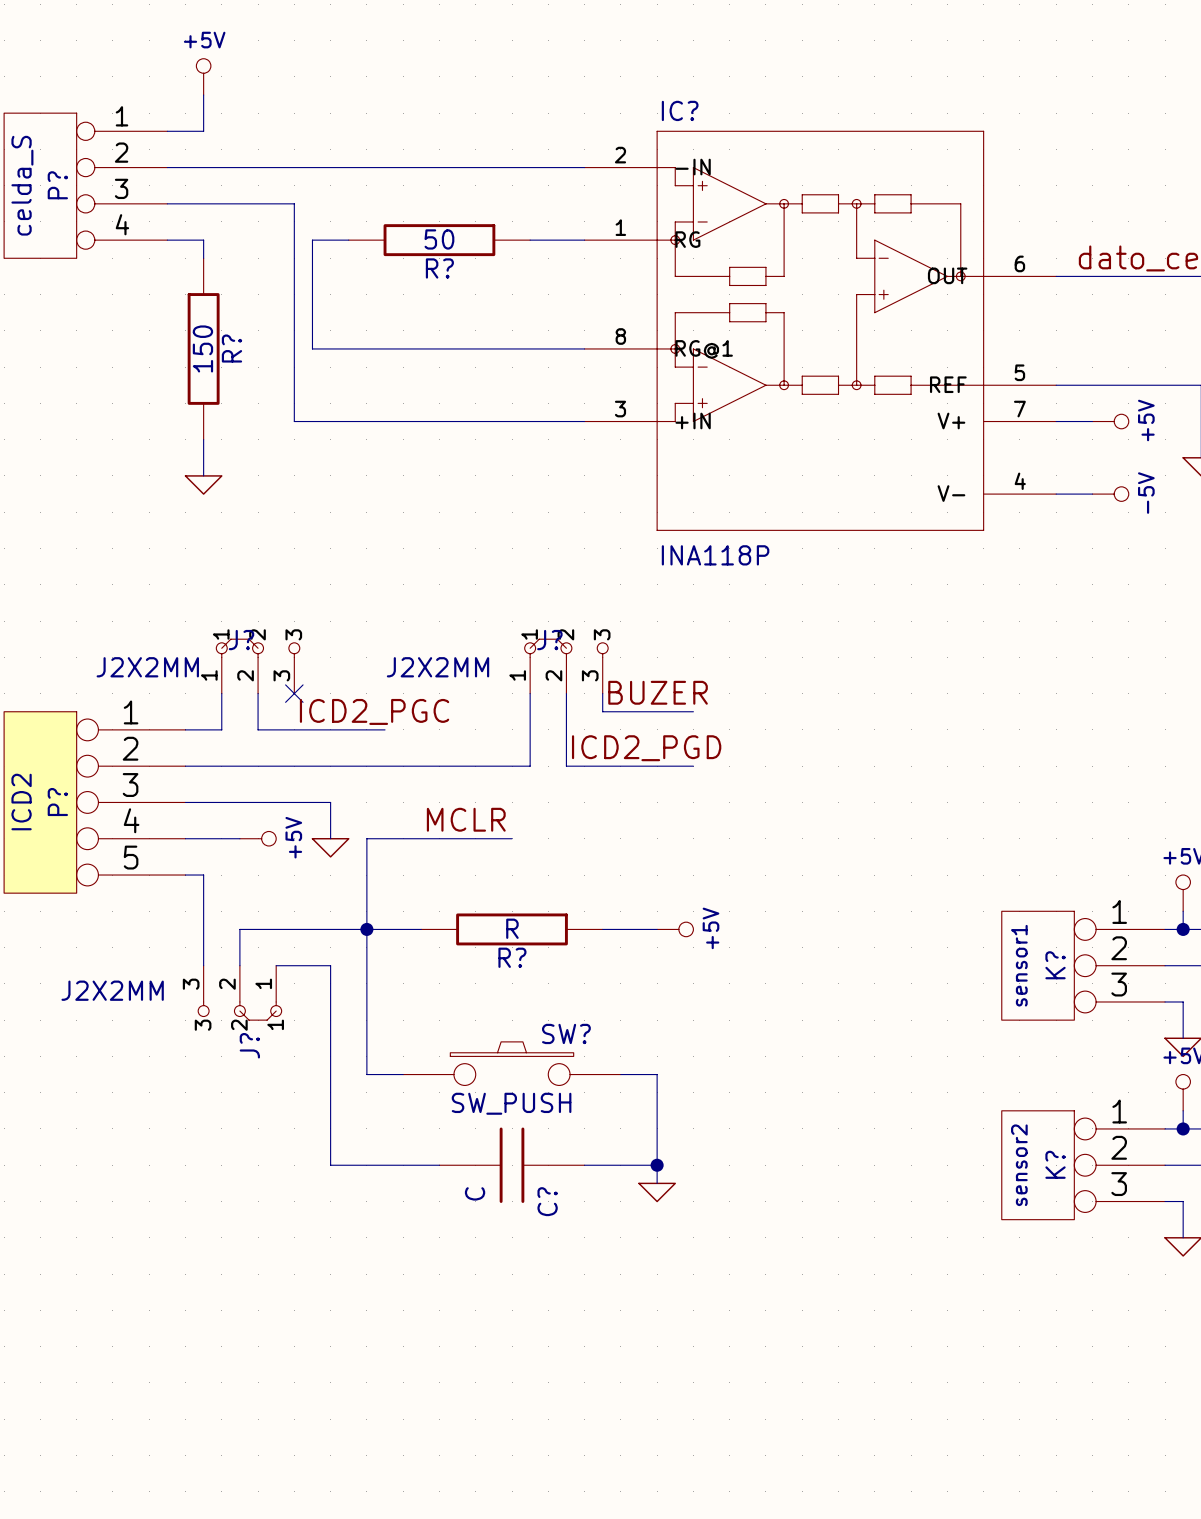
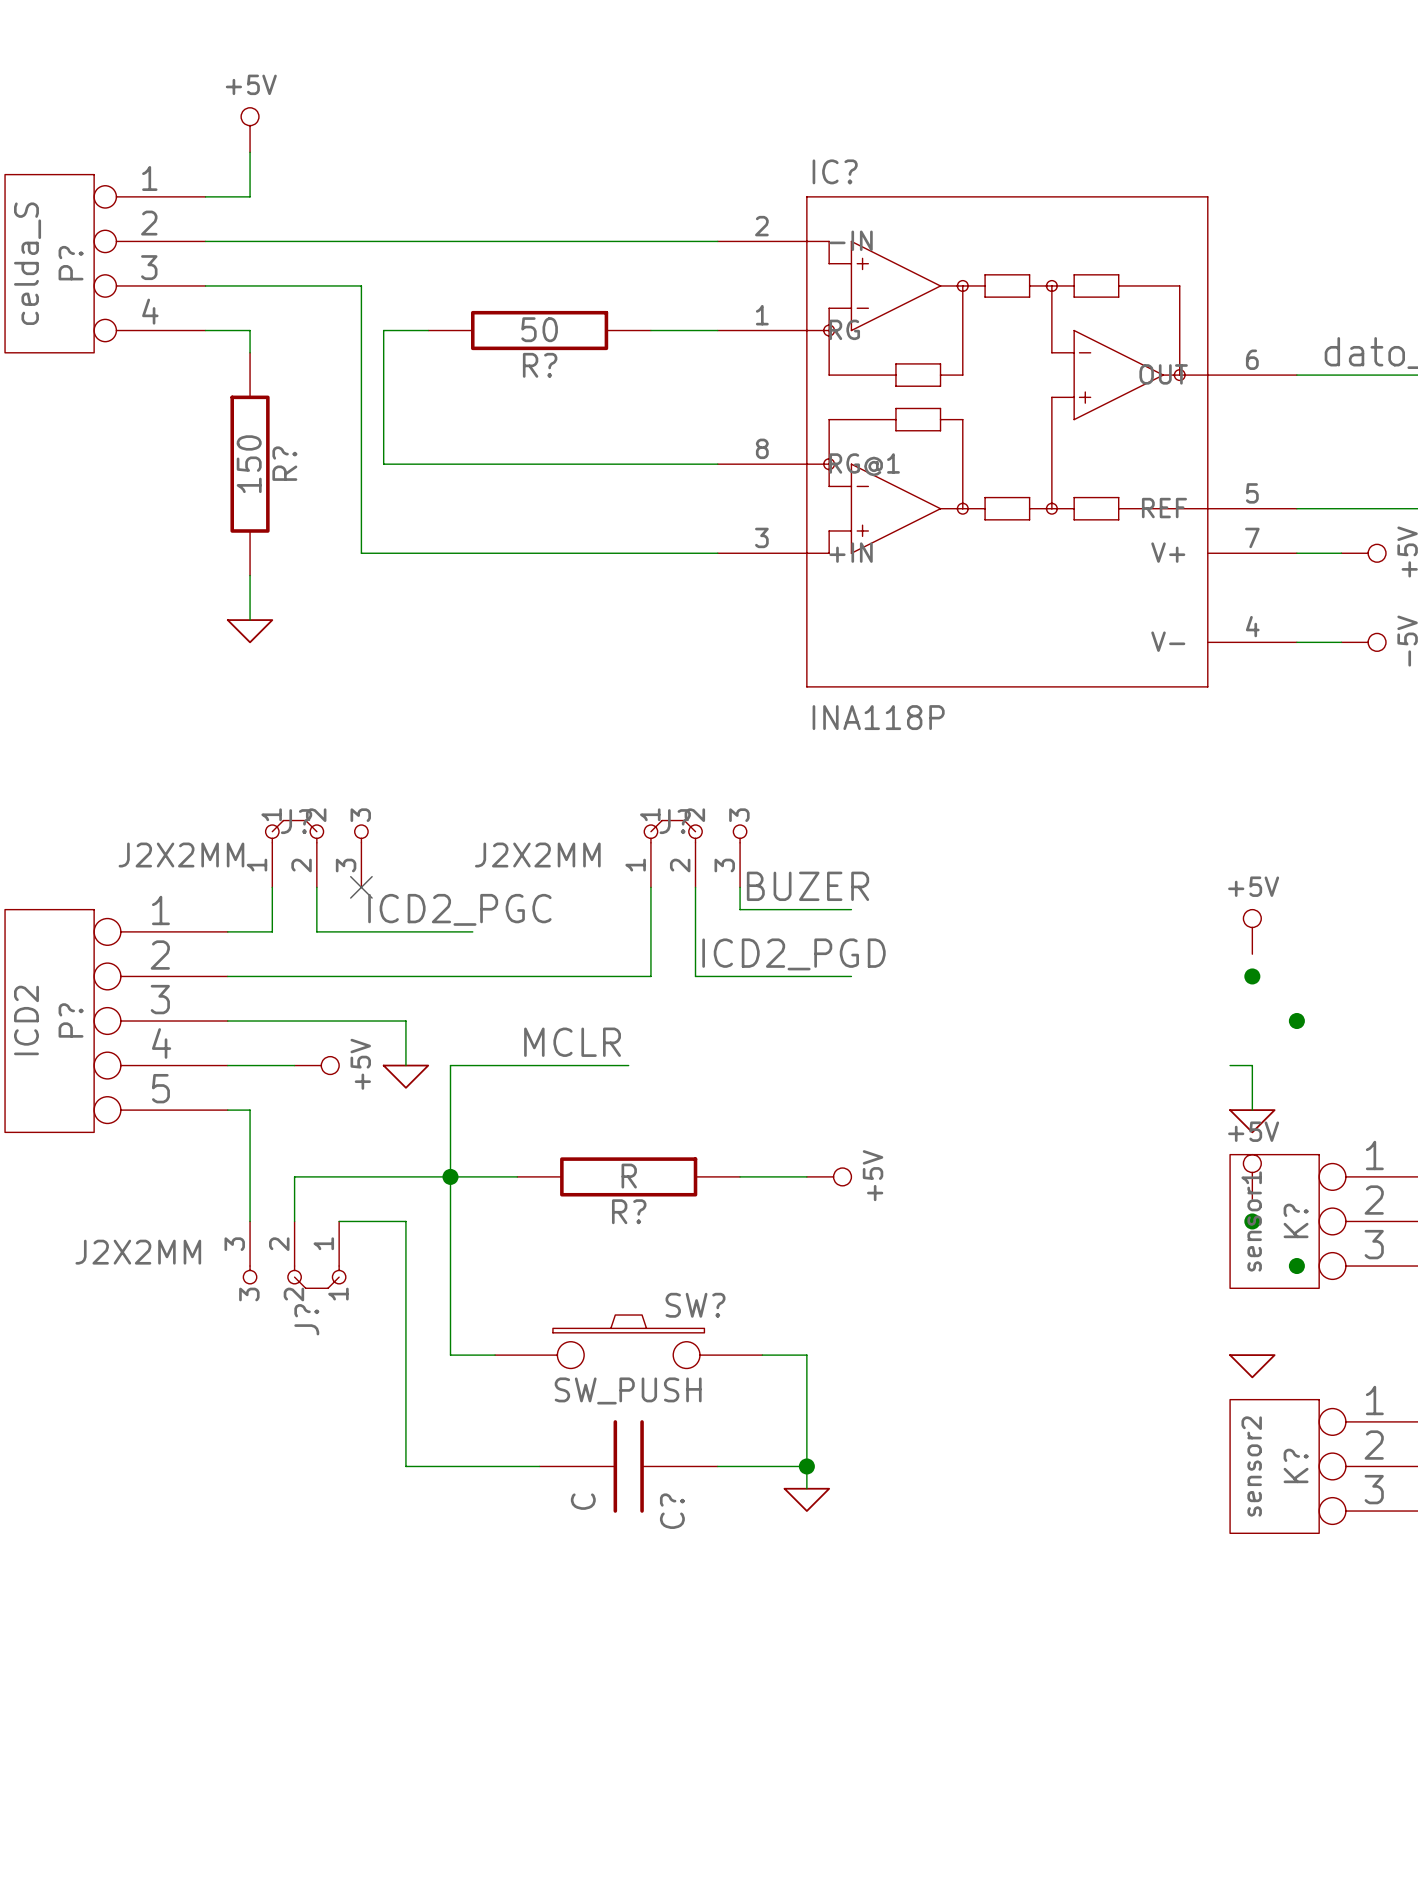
power symbol: none -> +5V (1252, 931)
junction: none -> (1252, 976)
junction: none -> (1296, 1021)
wire: none -> (1230, 1065) (1252, 1065) (1252, 1110)
power symbol: none -> (1252, 1121)
power symbol: none -> +5V (1252, 1176)
junction: none -> (1252, 1221)
junction: none -> (1296, 1266)
power symbol: none -> (1252, 1366)

